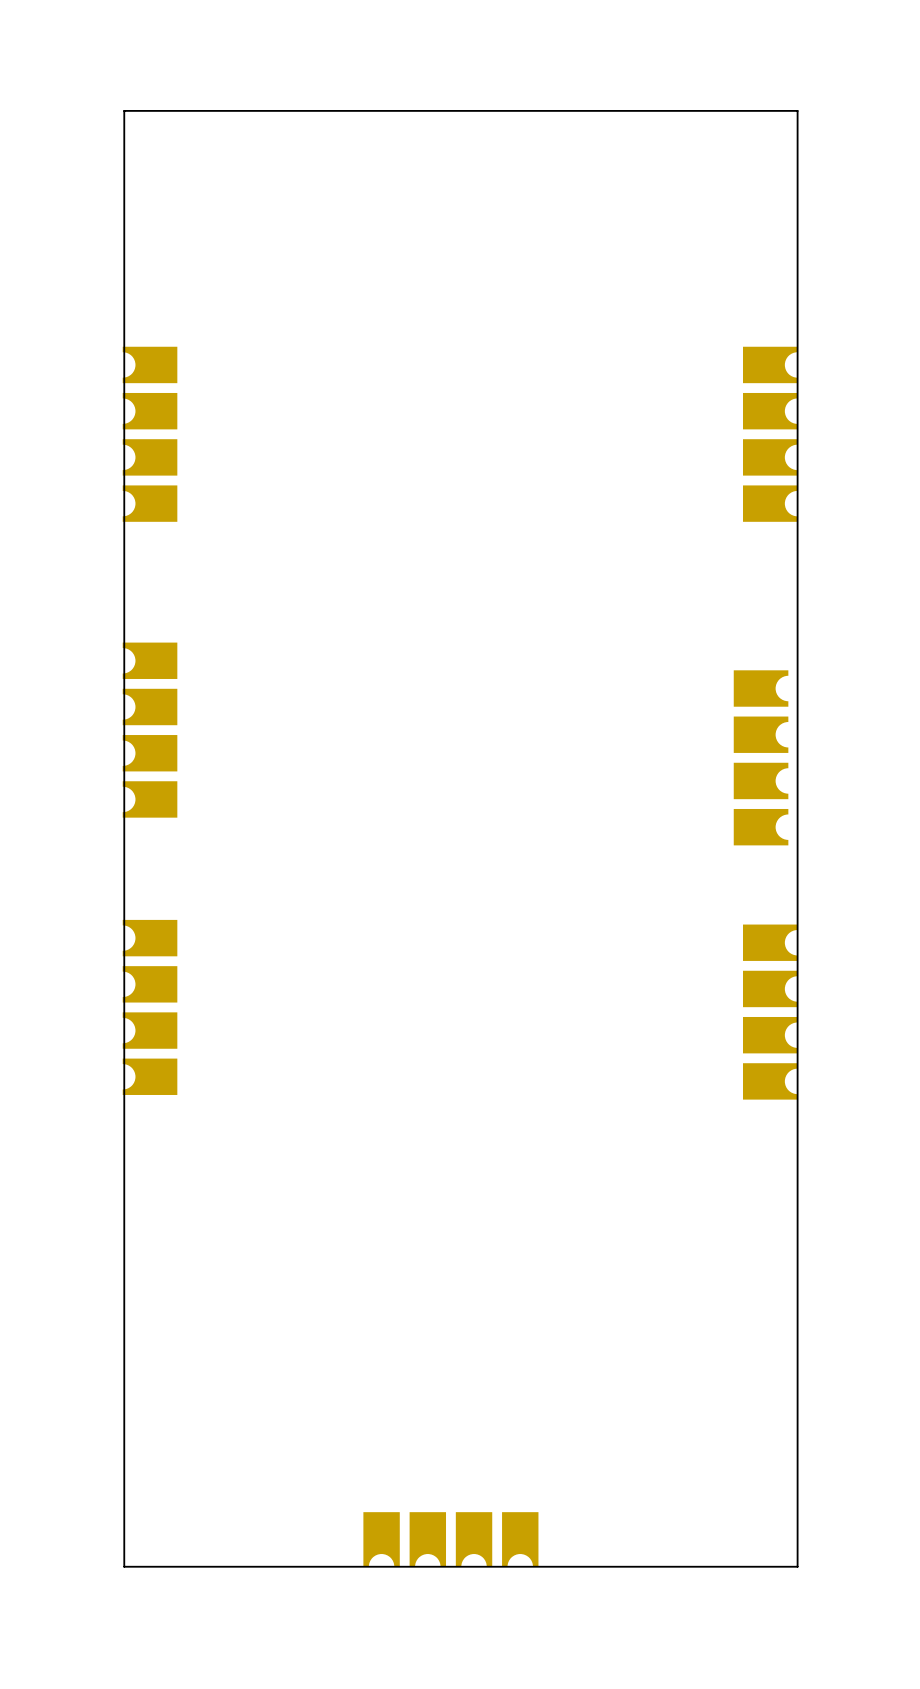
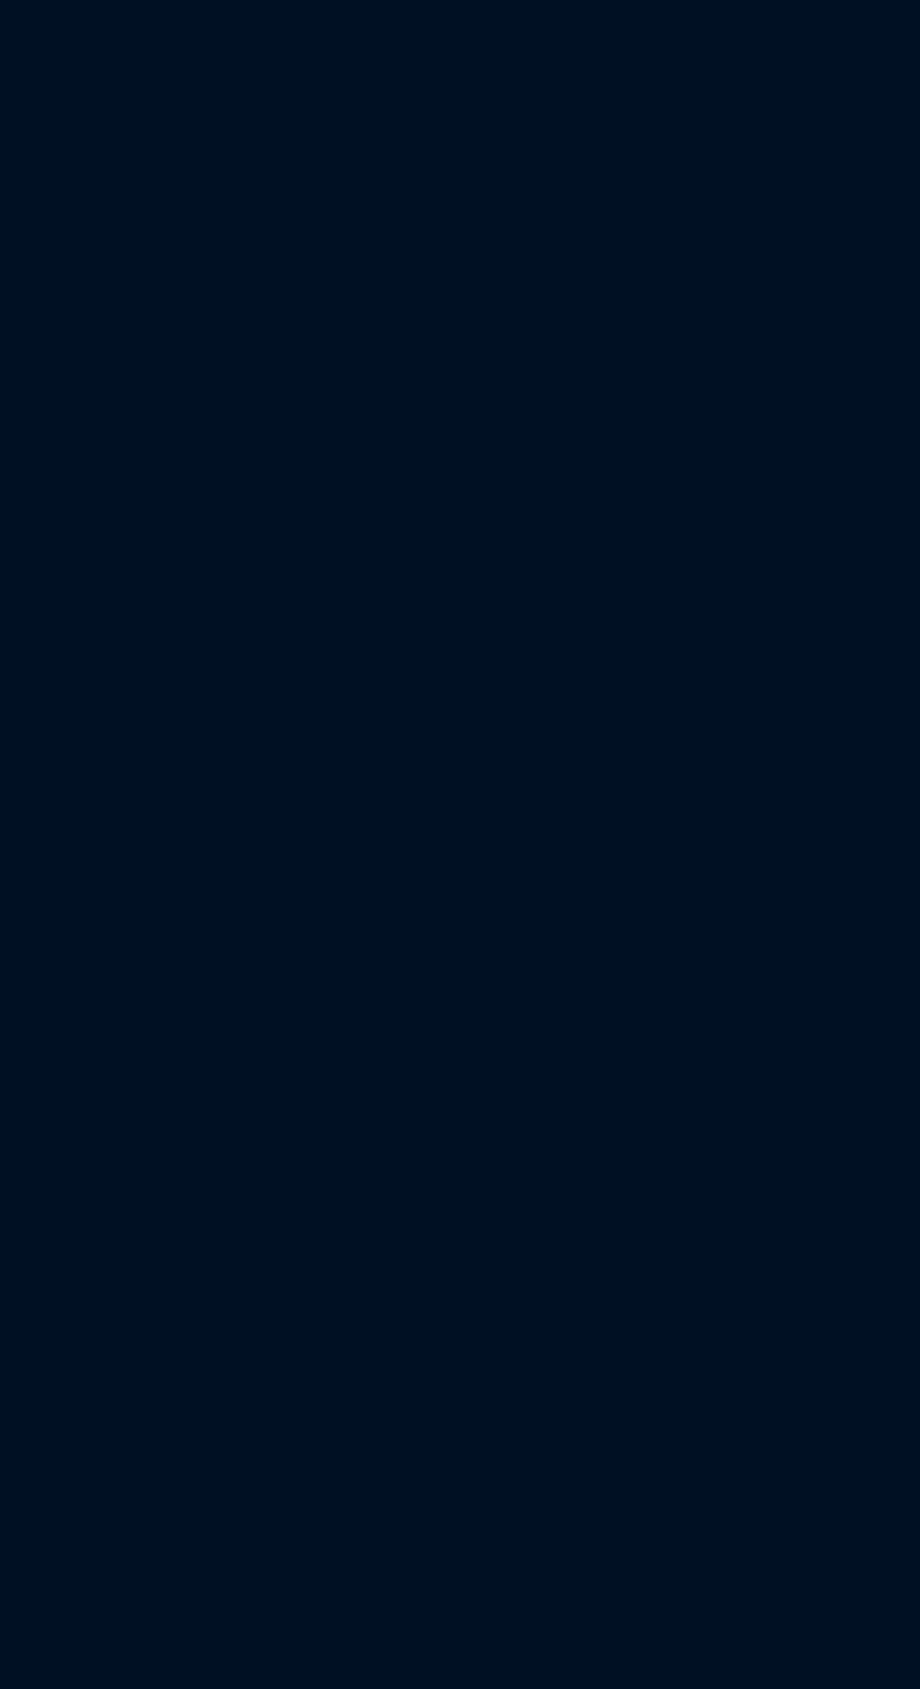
board edge: (797, 110) (124, 110) (124, 1566) (797, 1566) (797, 110) -> none
part: (143, 434) -> none
part: (776, 434) -> none
part: (143, 730) -> none
part: (767, 757) -> none
part: (143, 1007) -> none
part: (776, 1012) -> none
part: (450, 1545) -> none

